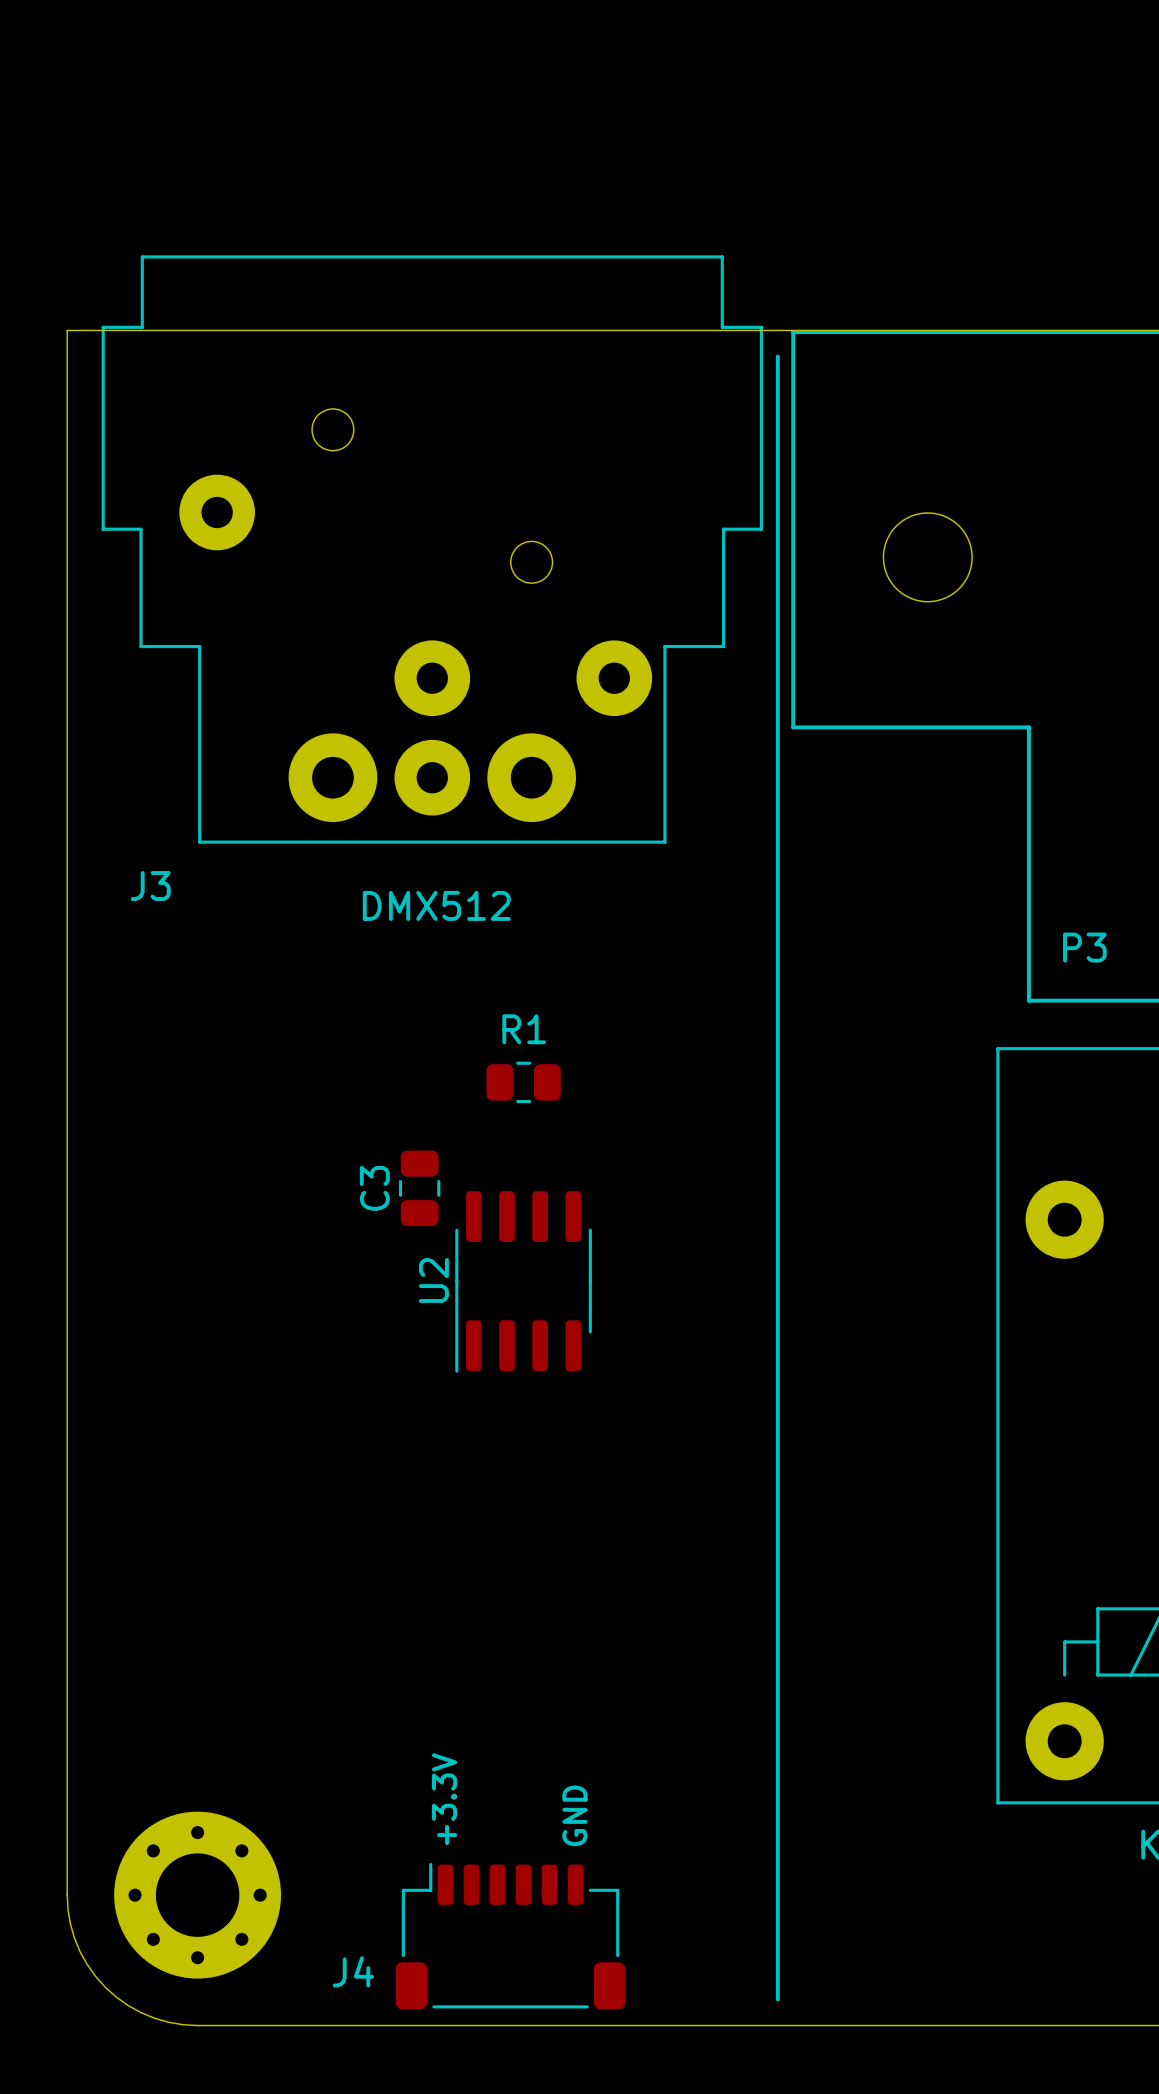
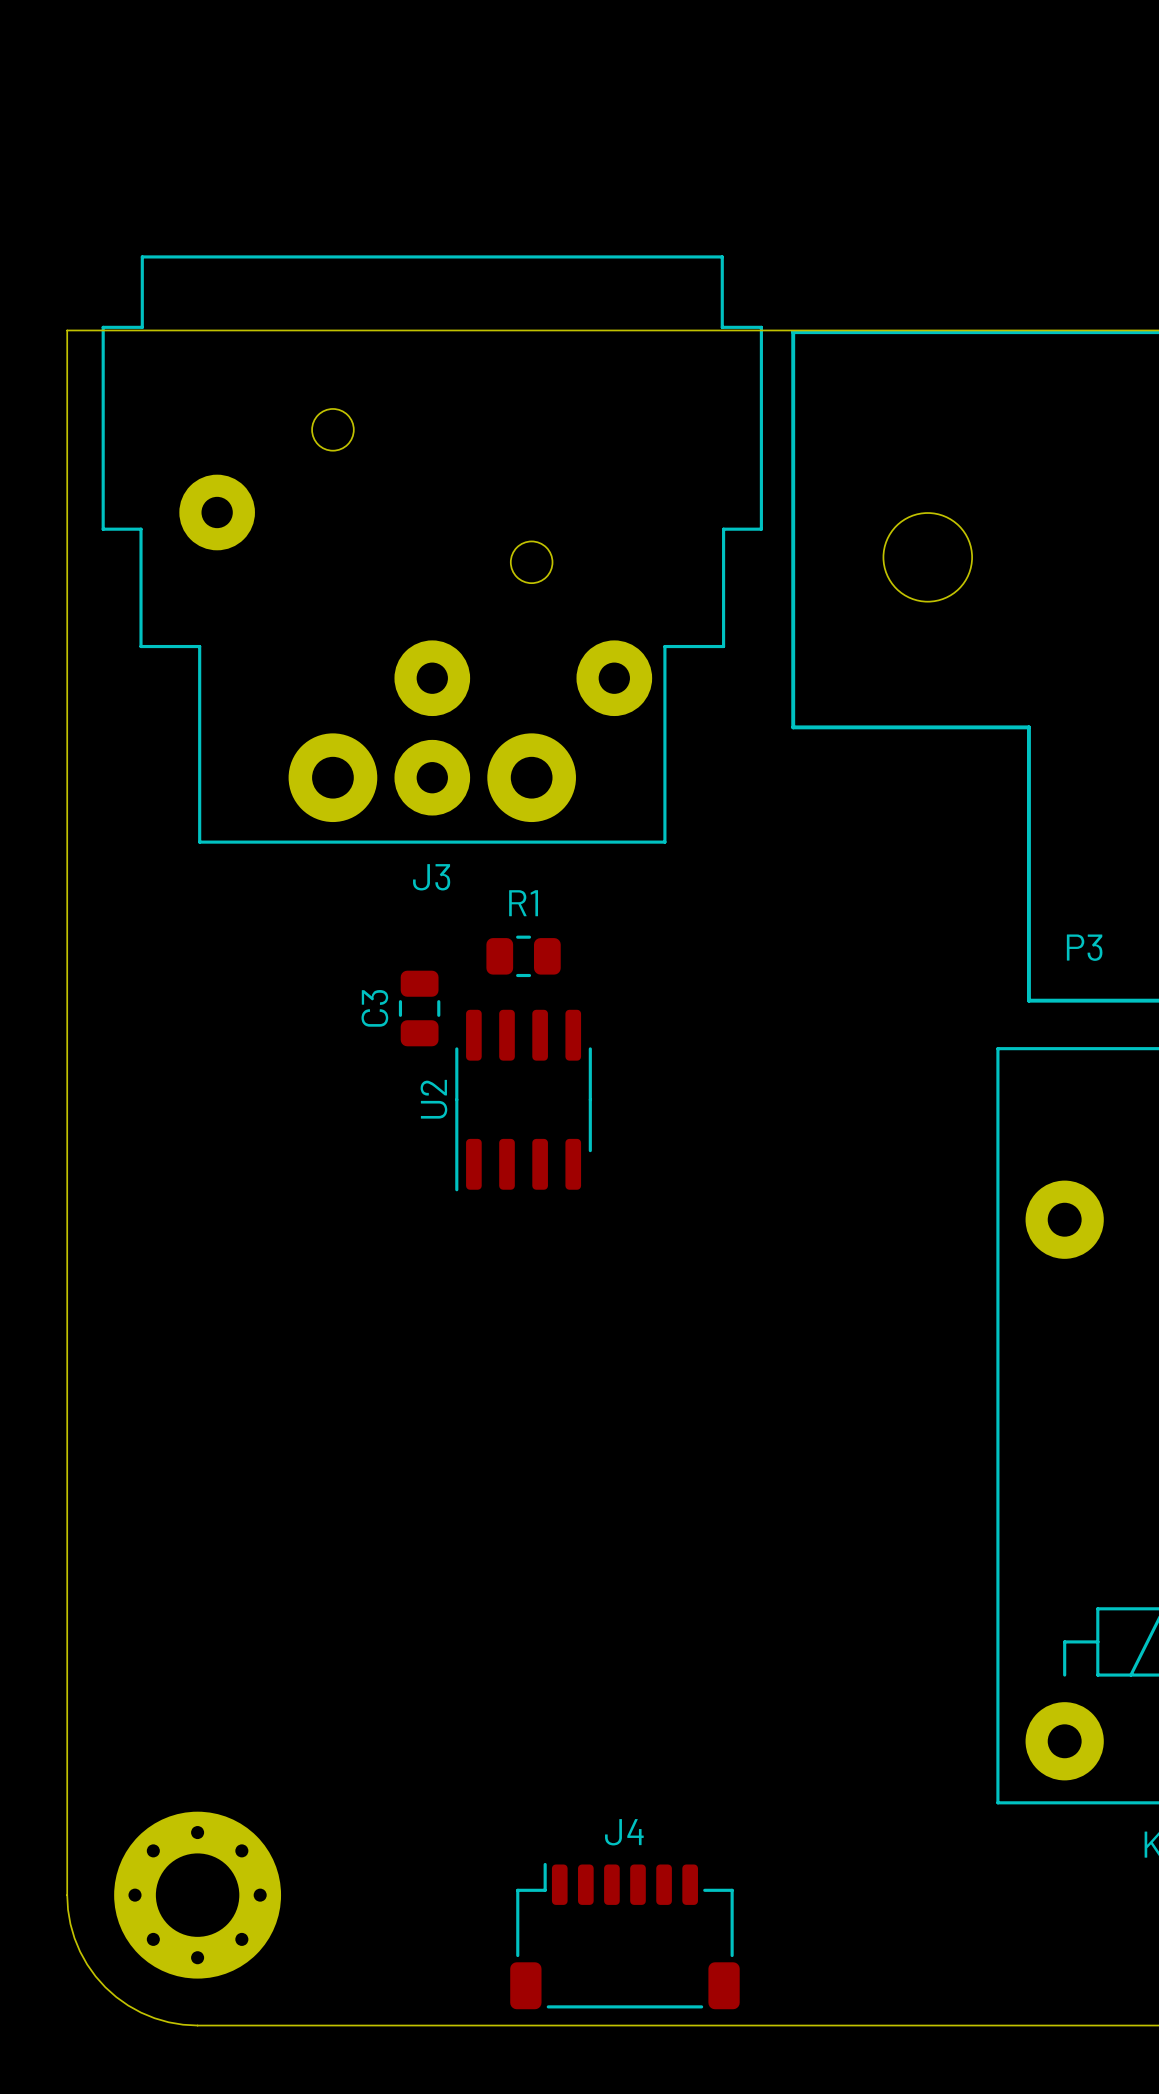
line: (777, 356) (777, 1999) -> none
J3 name position: J3 (150, 886) -> J3 (431, 877)
text: DMX512 (436, 905) -> none
R1 position: (523, 1082) -> (523, 956)
C3 position: (419, 1188) -> (419, 1008)
U2 position: (523, 1281) -> (523, 1100)
text: +3.3V (444, 1799) -> none
text: GND (574, 1815) -> none
J4 position: (510, 1936) -> (624, 1936)
J4 name position: J4 (353, 1971) -> J4 (624, 1832)

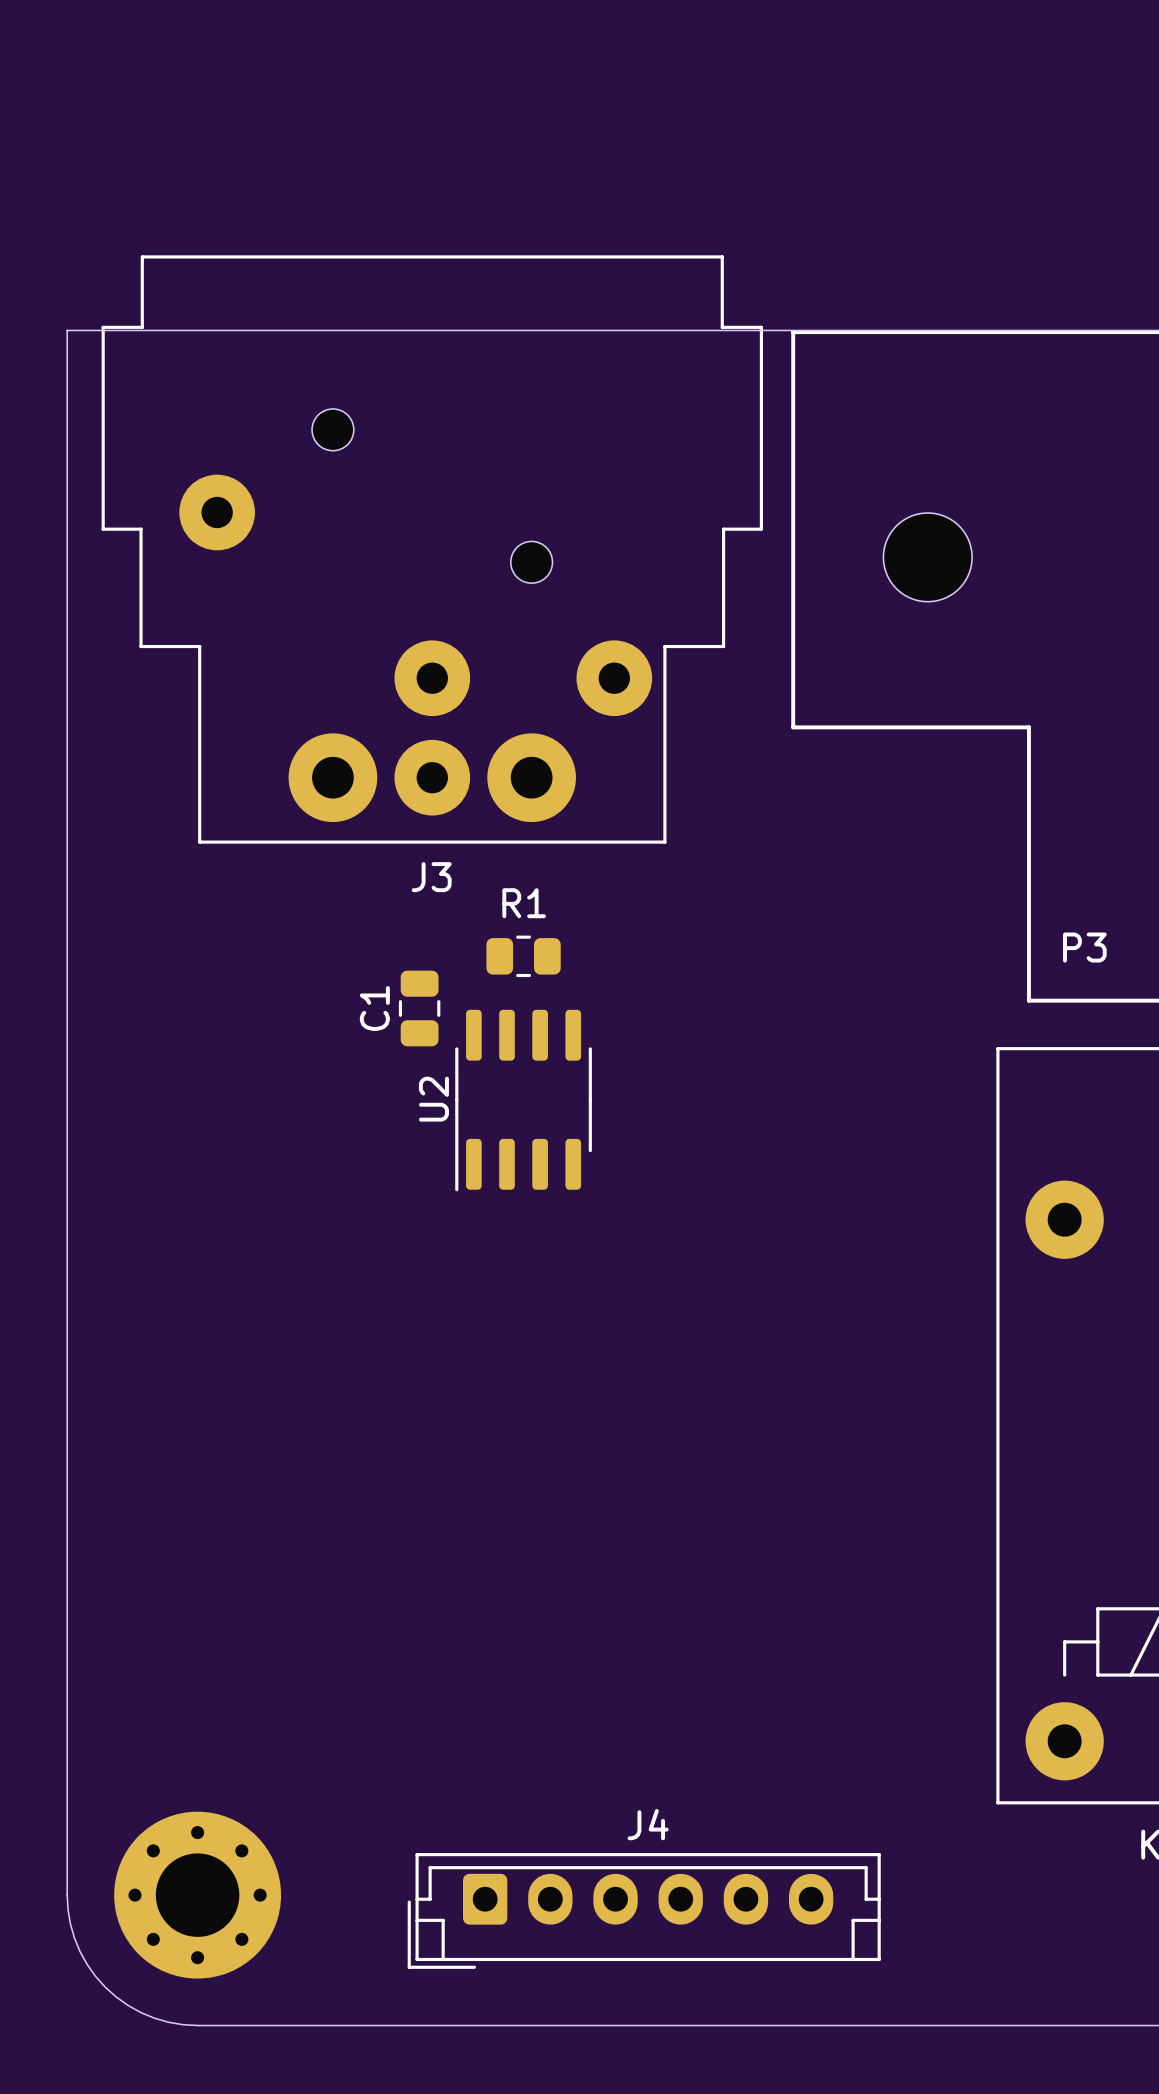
C3 name: C3 (374, 1008) -> C1 (374, 1008)
J4 footprint: [510, 1862, 740, 2010] -> [407, 1853, 881, 1969]

